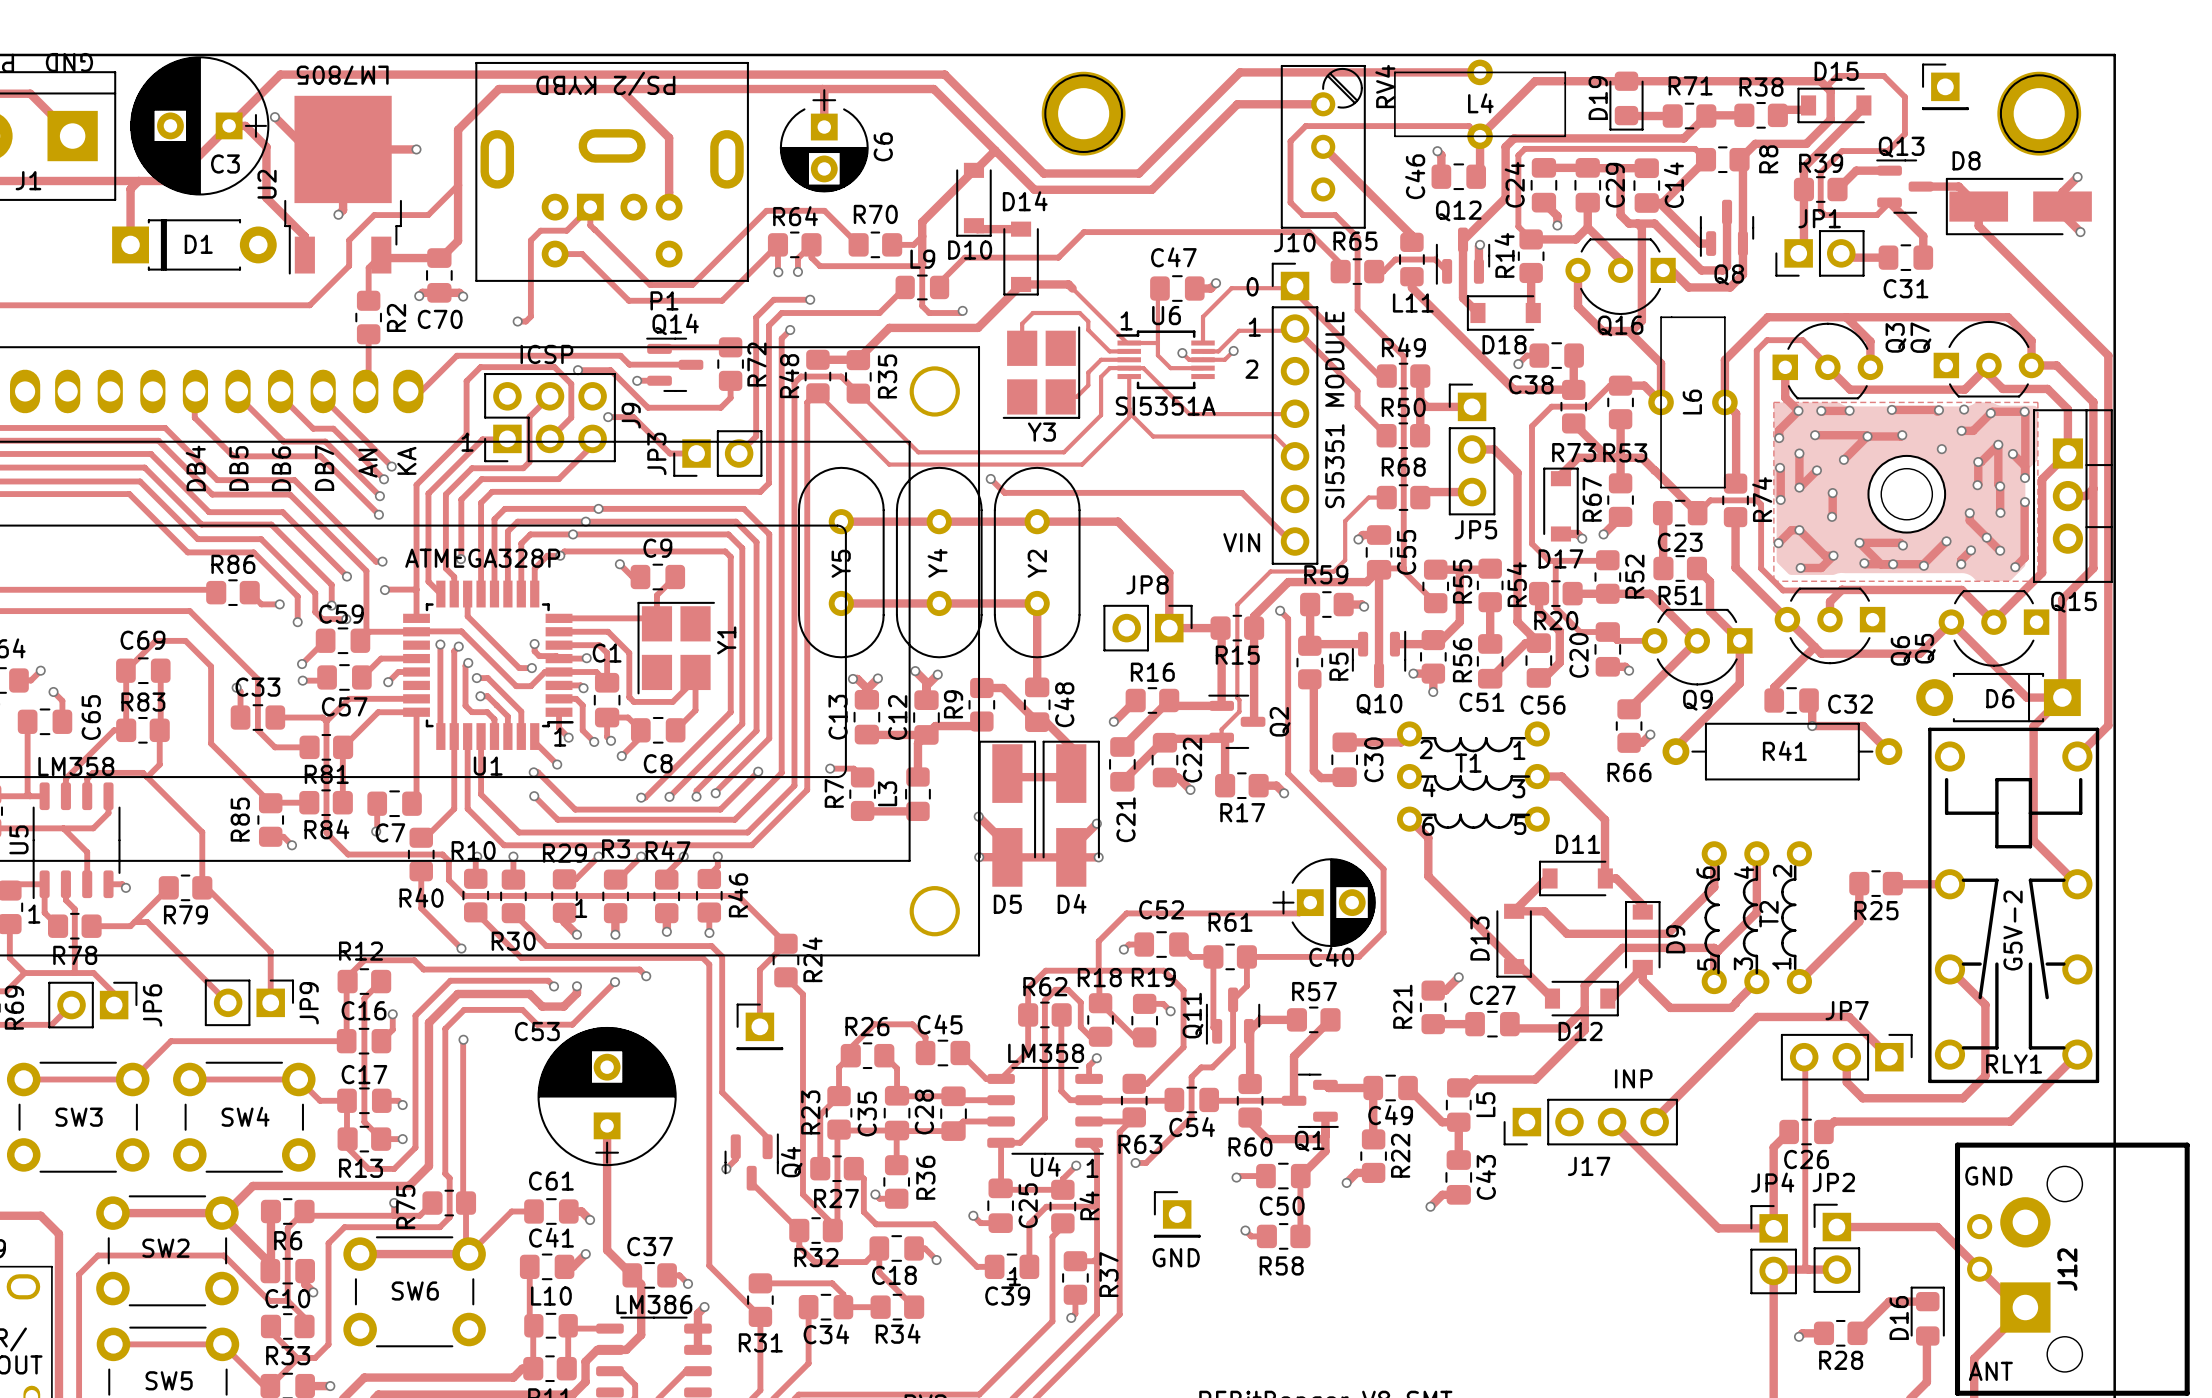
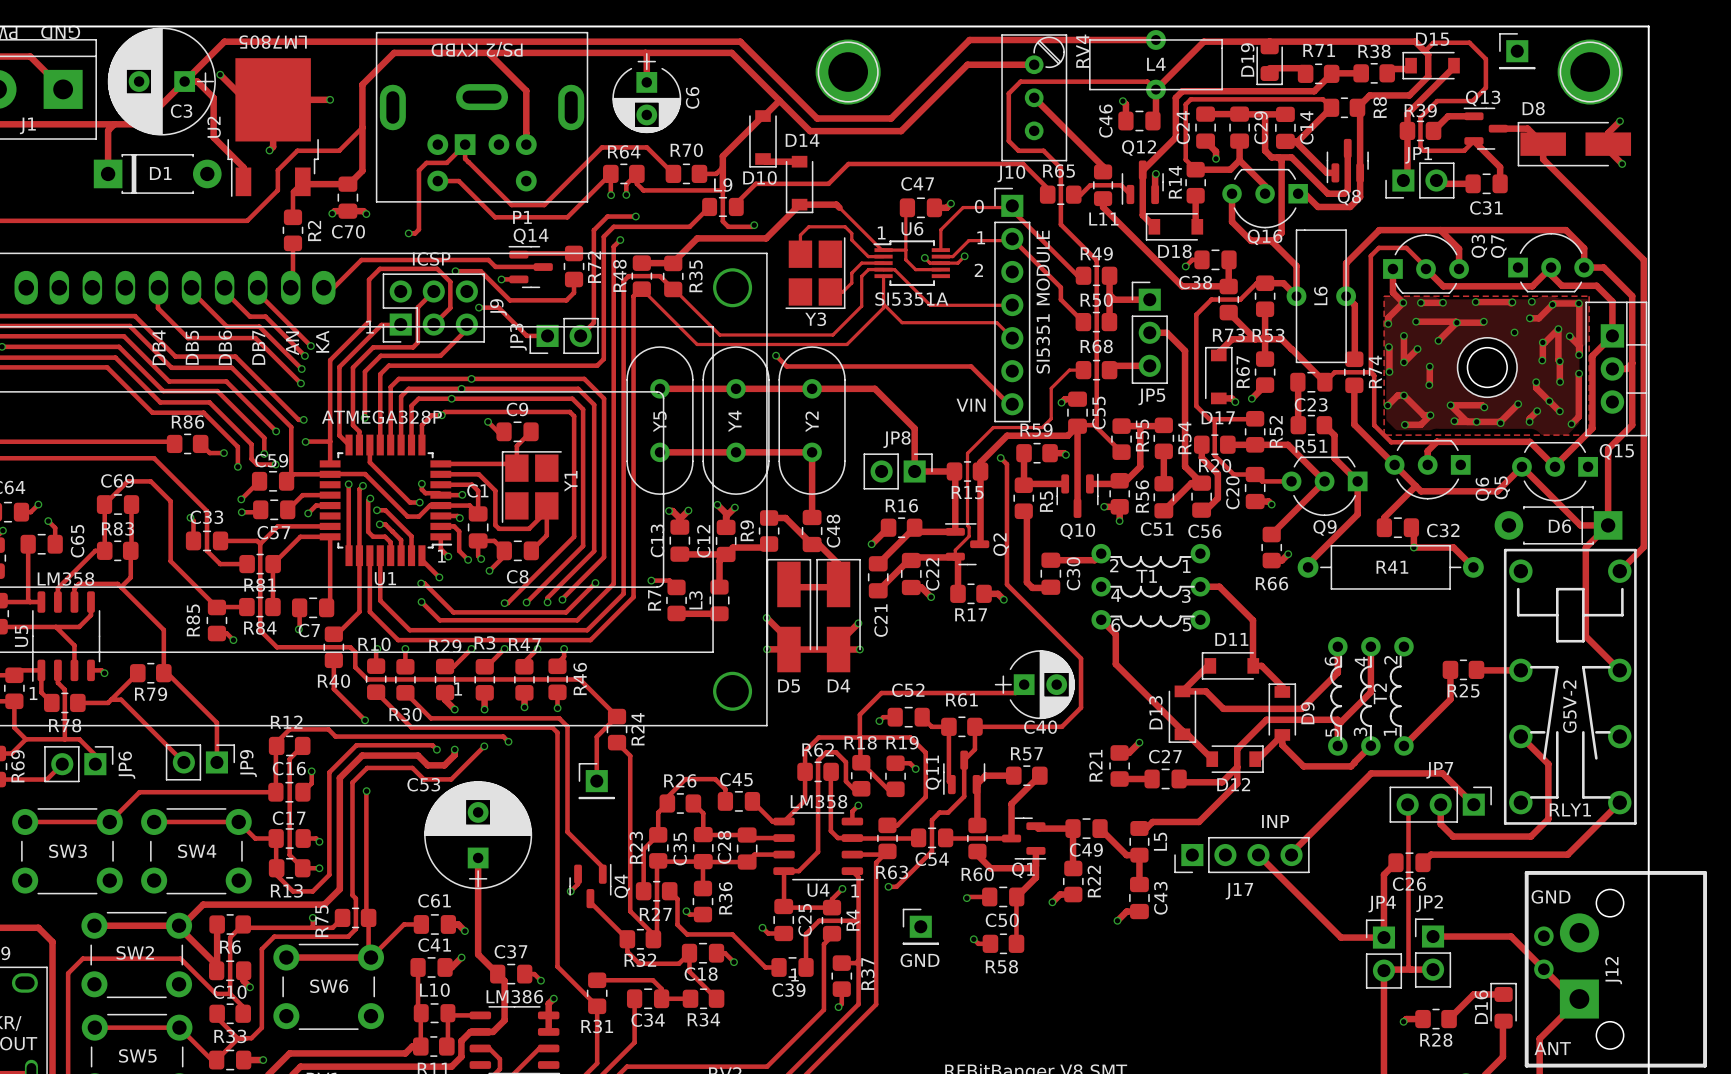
track: none -> (1269, 41) (1203, 41) (1198, 46)
track: (1535, 81) (1820, 81) -> (1269, 41) (1415, 41) (1420, 46)
track: none -> (1269, 68) (1305, 68)
track: (1626, 115) (1672, 116) -> none

